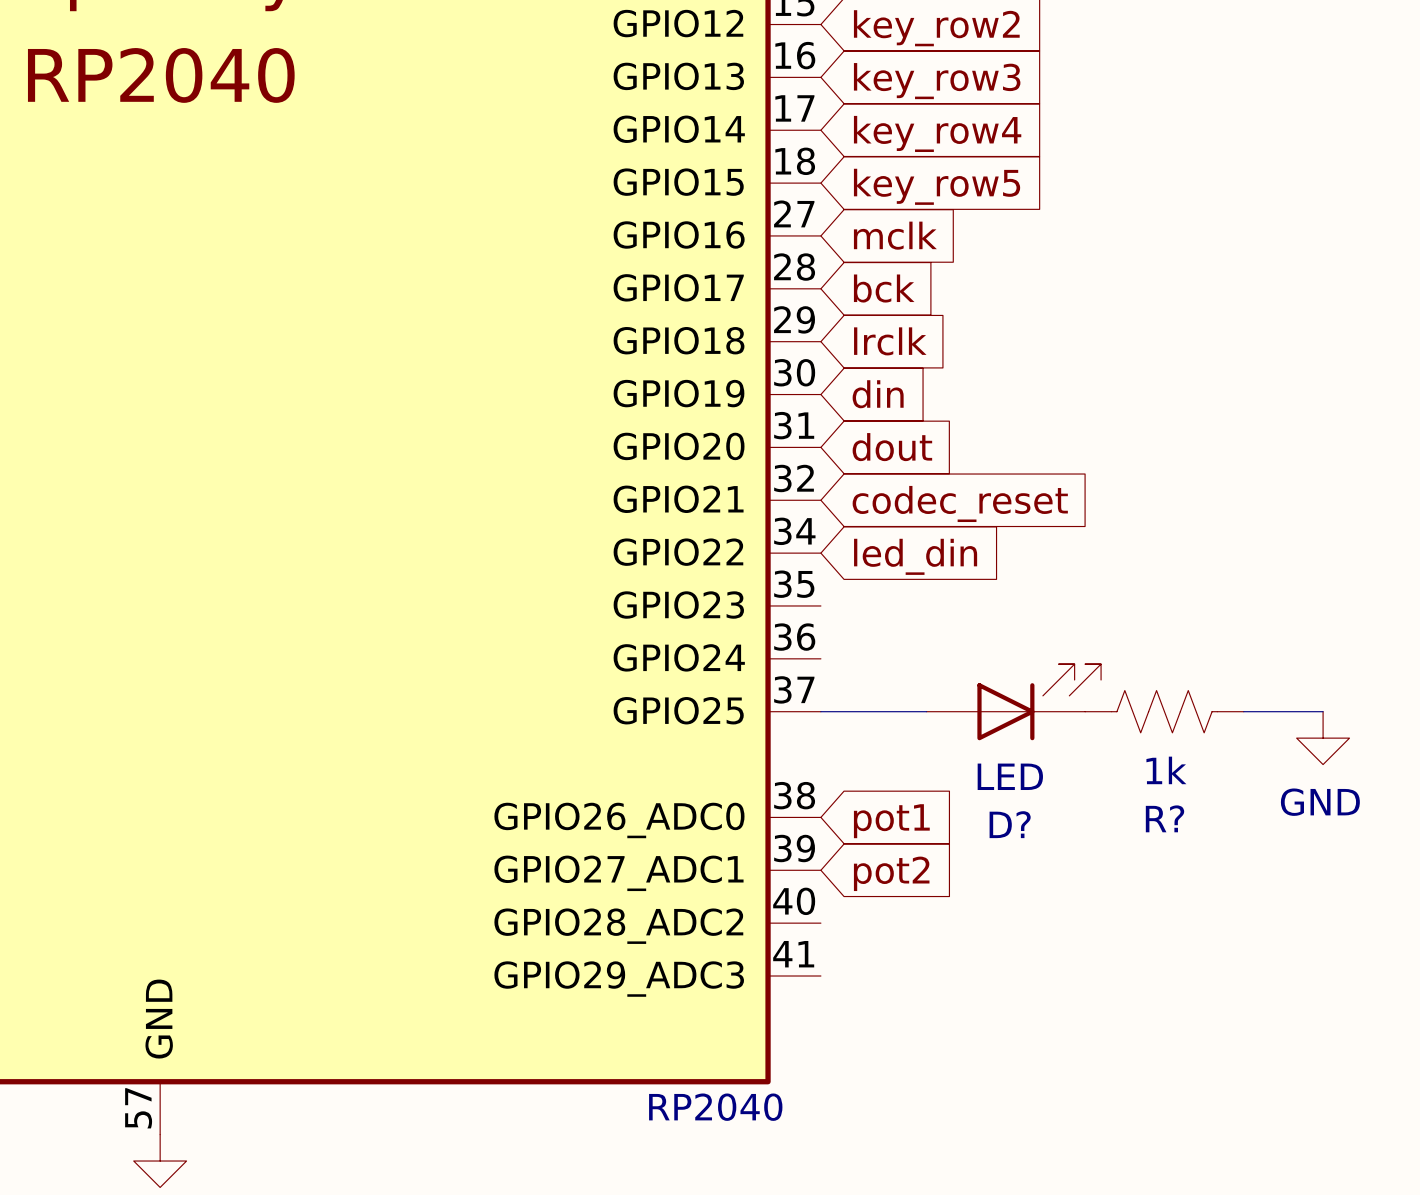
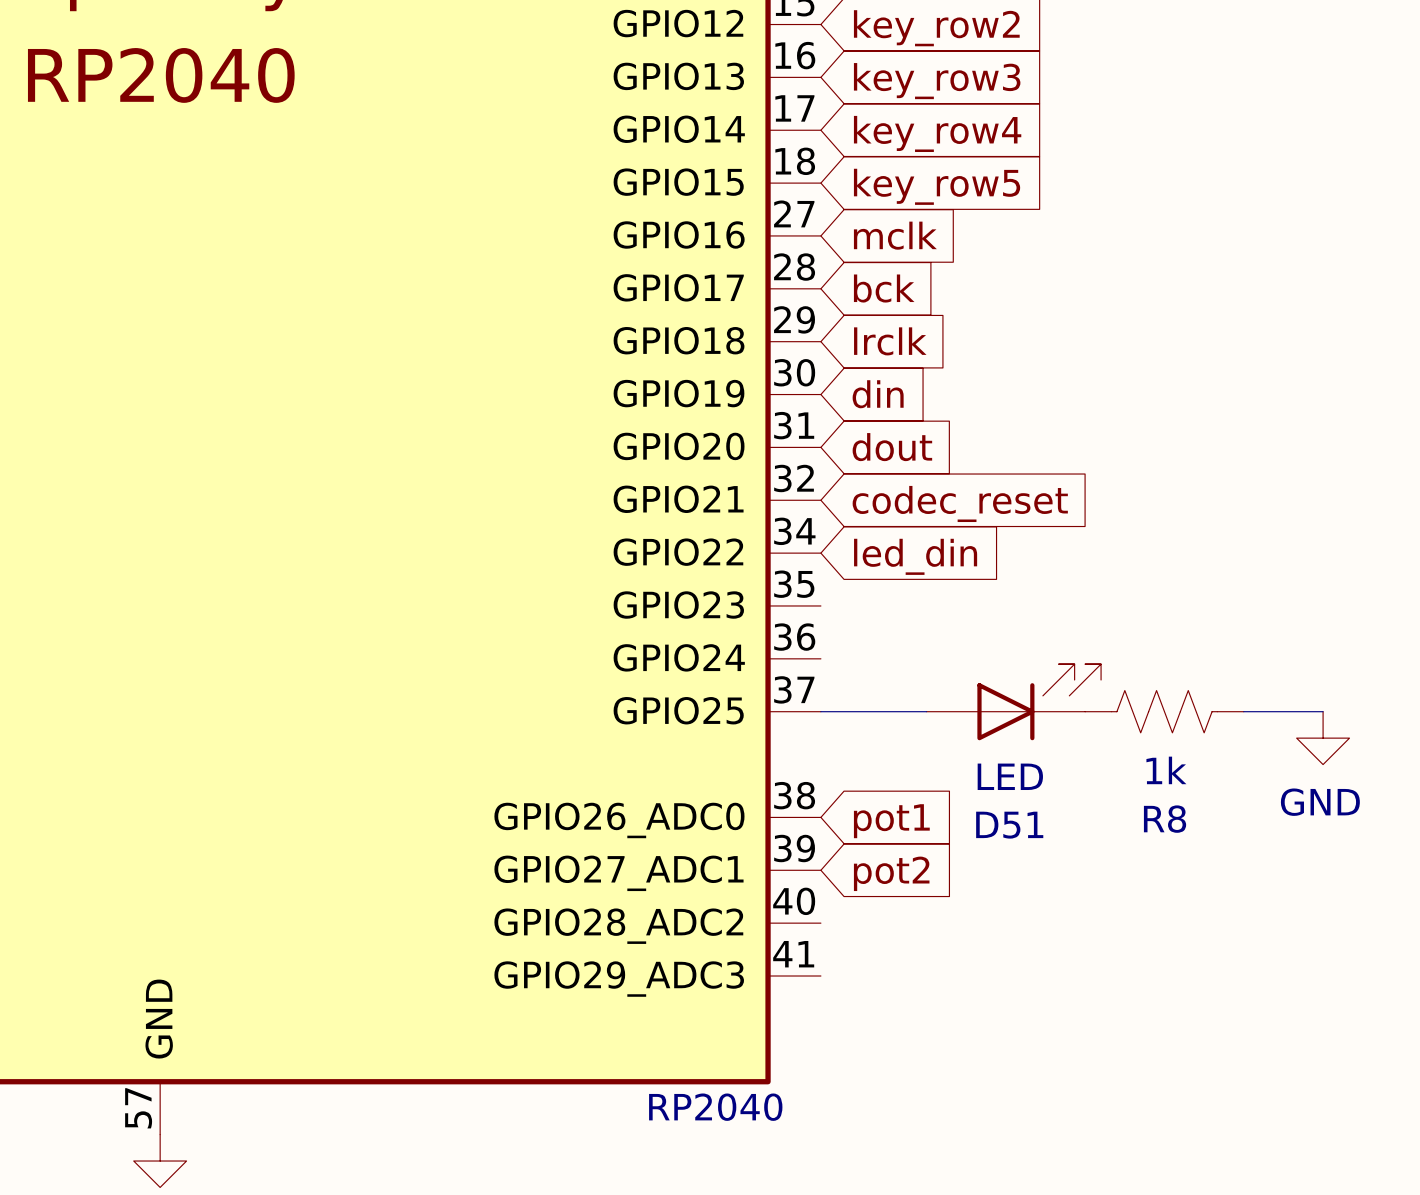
R? name: R? (1165, 818) -> R8 (1165, 819)
D? name: D? (1010, 824) -> D51 (1009, 825)

